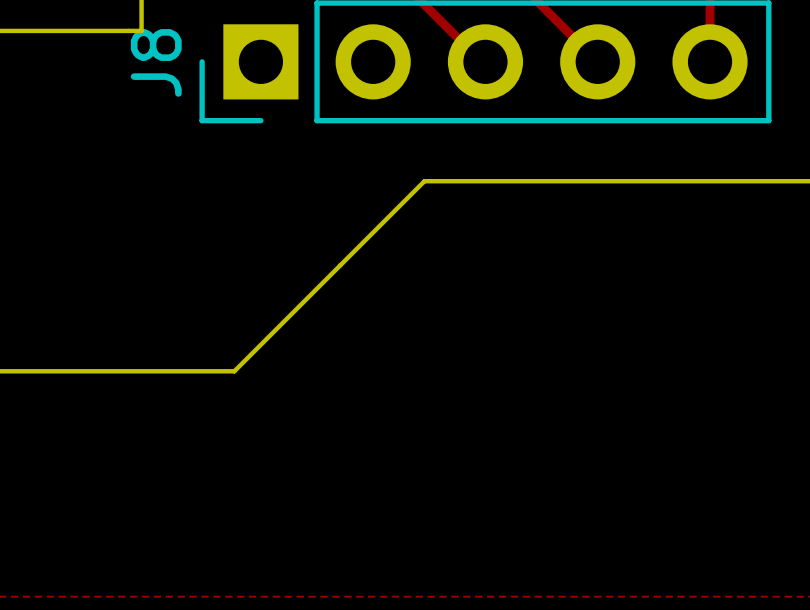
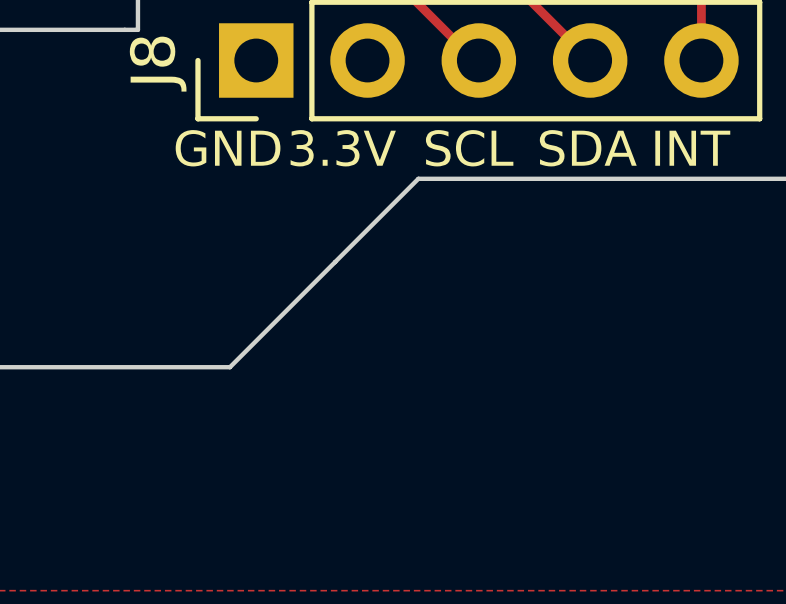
text: none -> GND (228, 148)
text: none -> 3.3V (343, 148)
text: none -> SCL (469, 148)
text: none -> SDA (588, 148)
text: none -> INT (692, 148)

